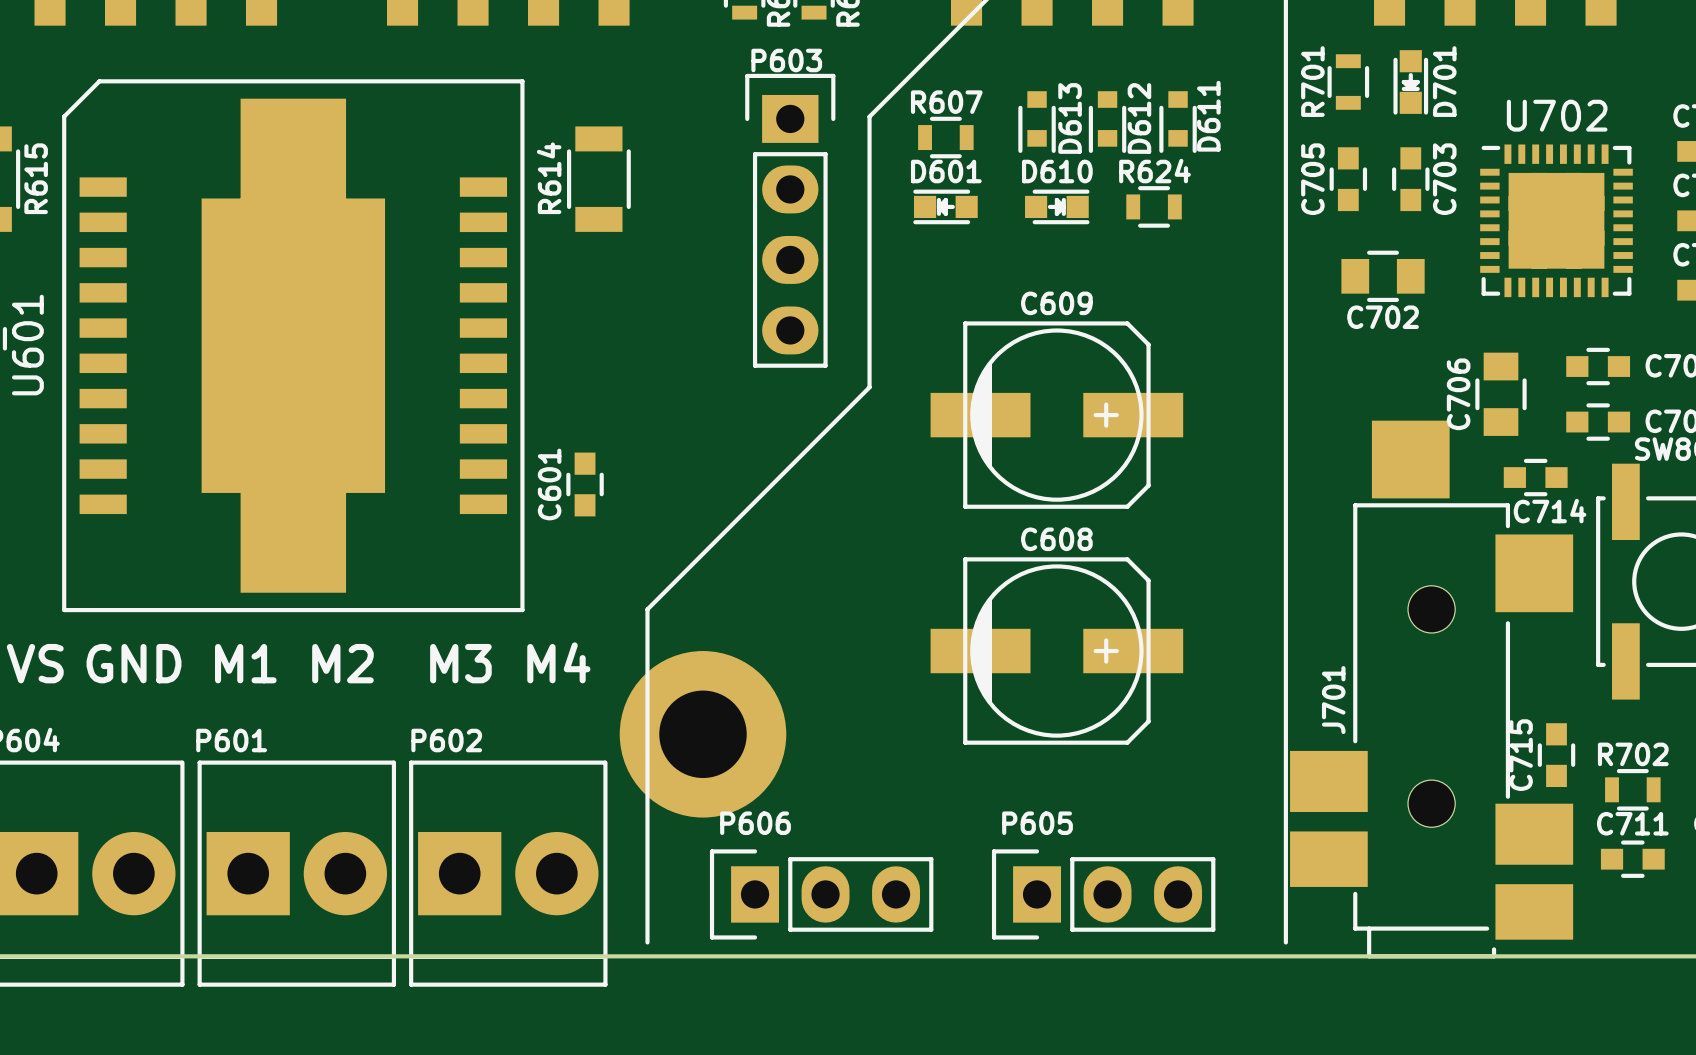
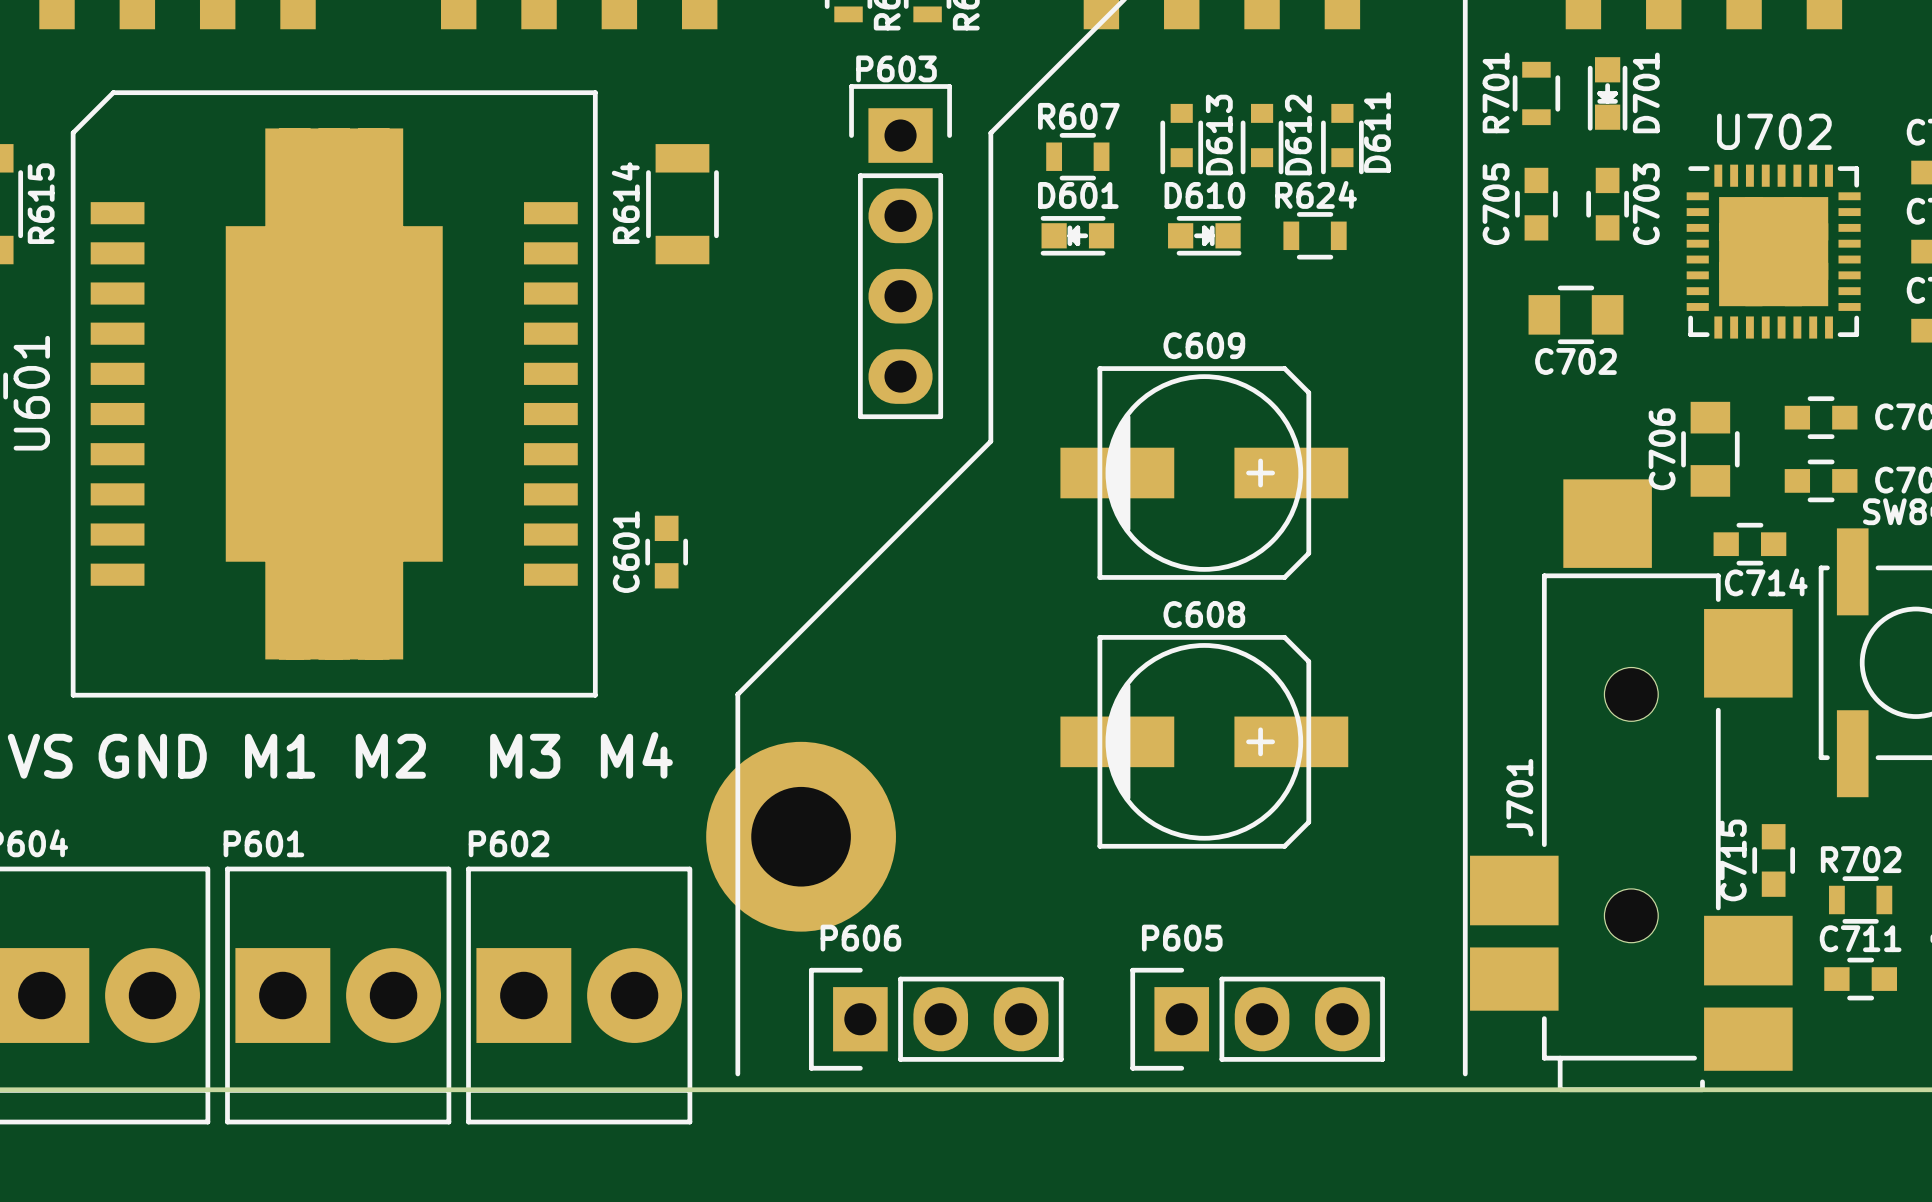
U601 footprint: [62, 79, 525, 613] -> [70, 90, 598, 698]

